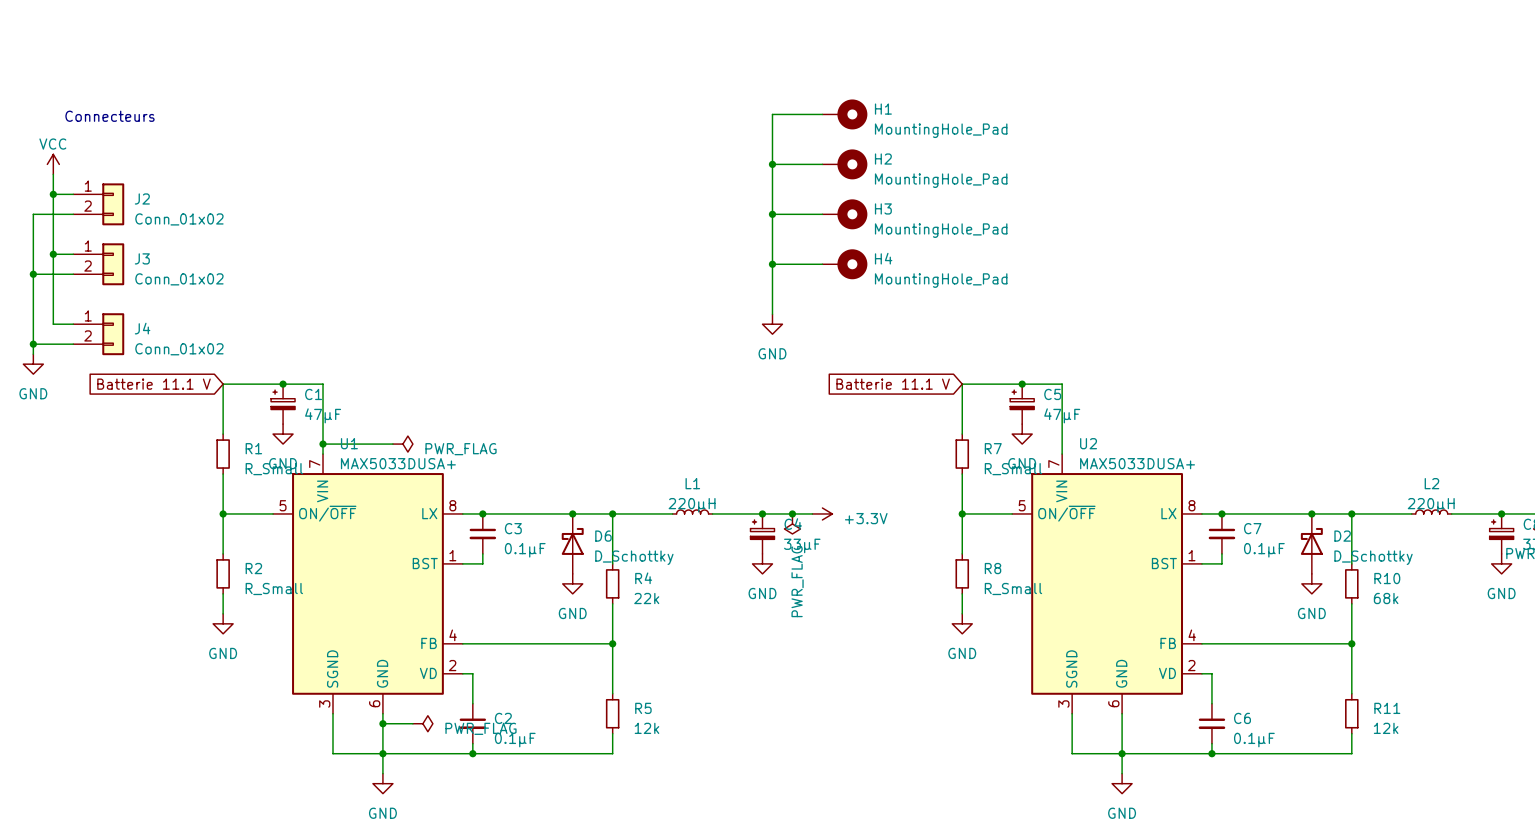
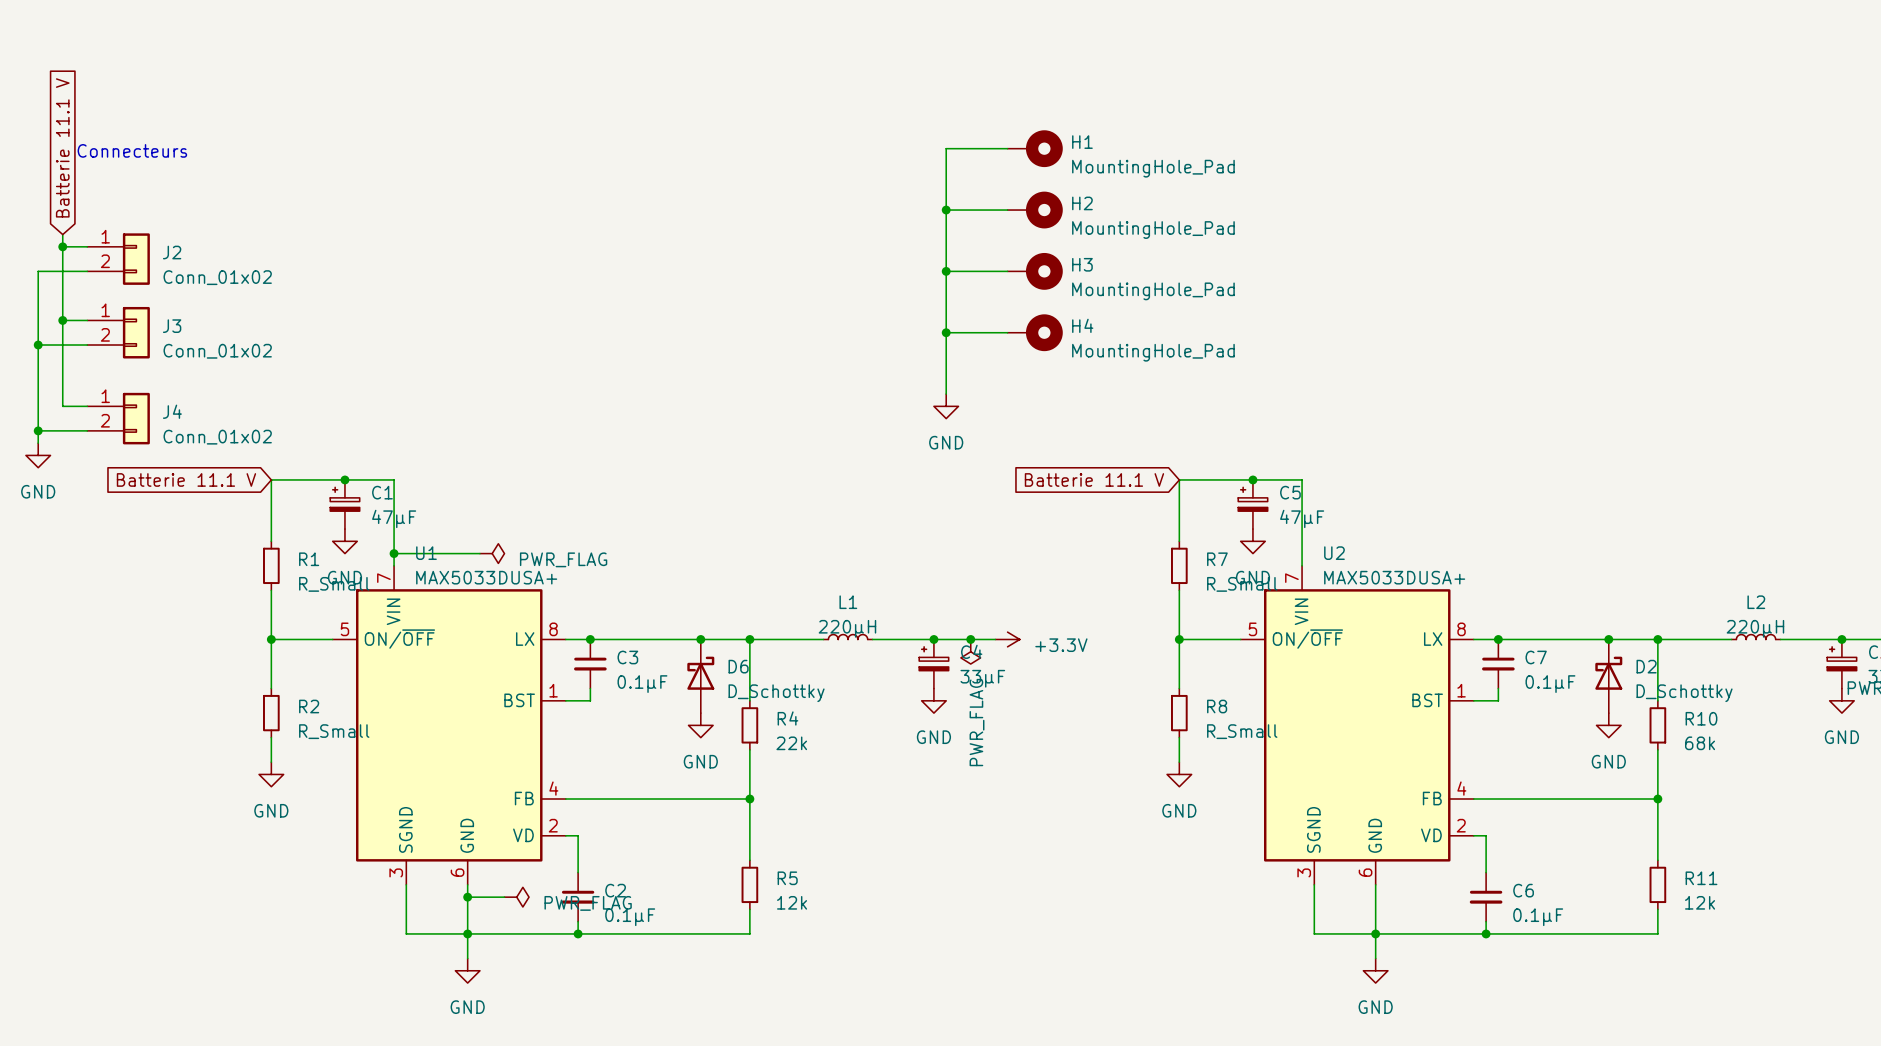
global label: none -> Batterie 11.1 V (62, 147)
power symbol: VCC (53, 164) -> none
wire: (53, 174) (53, 184) -> none

